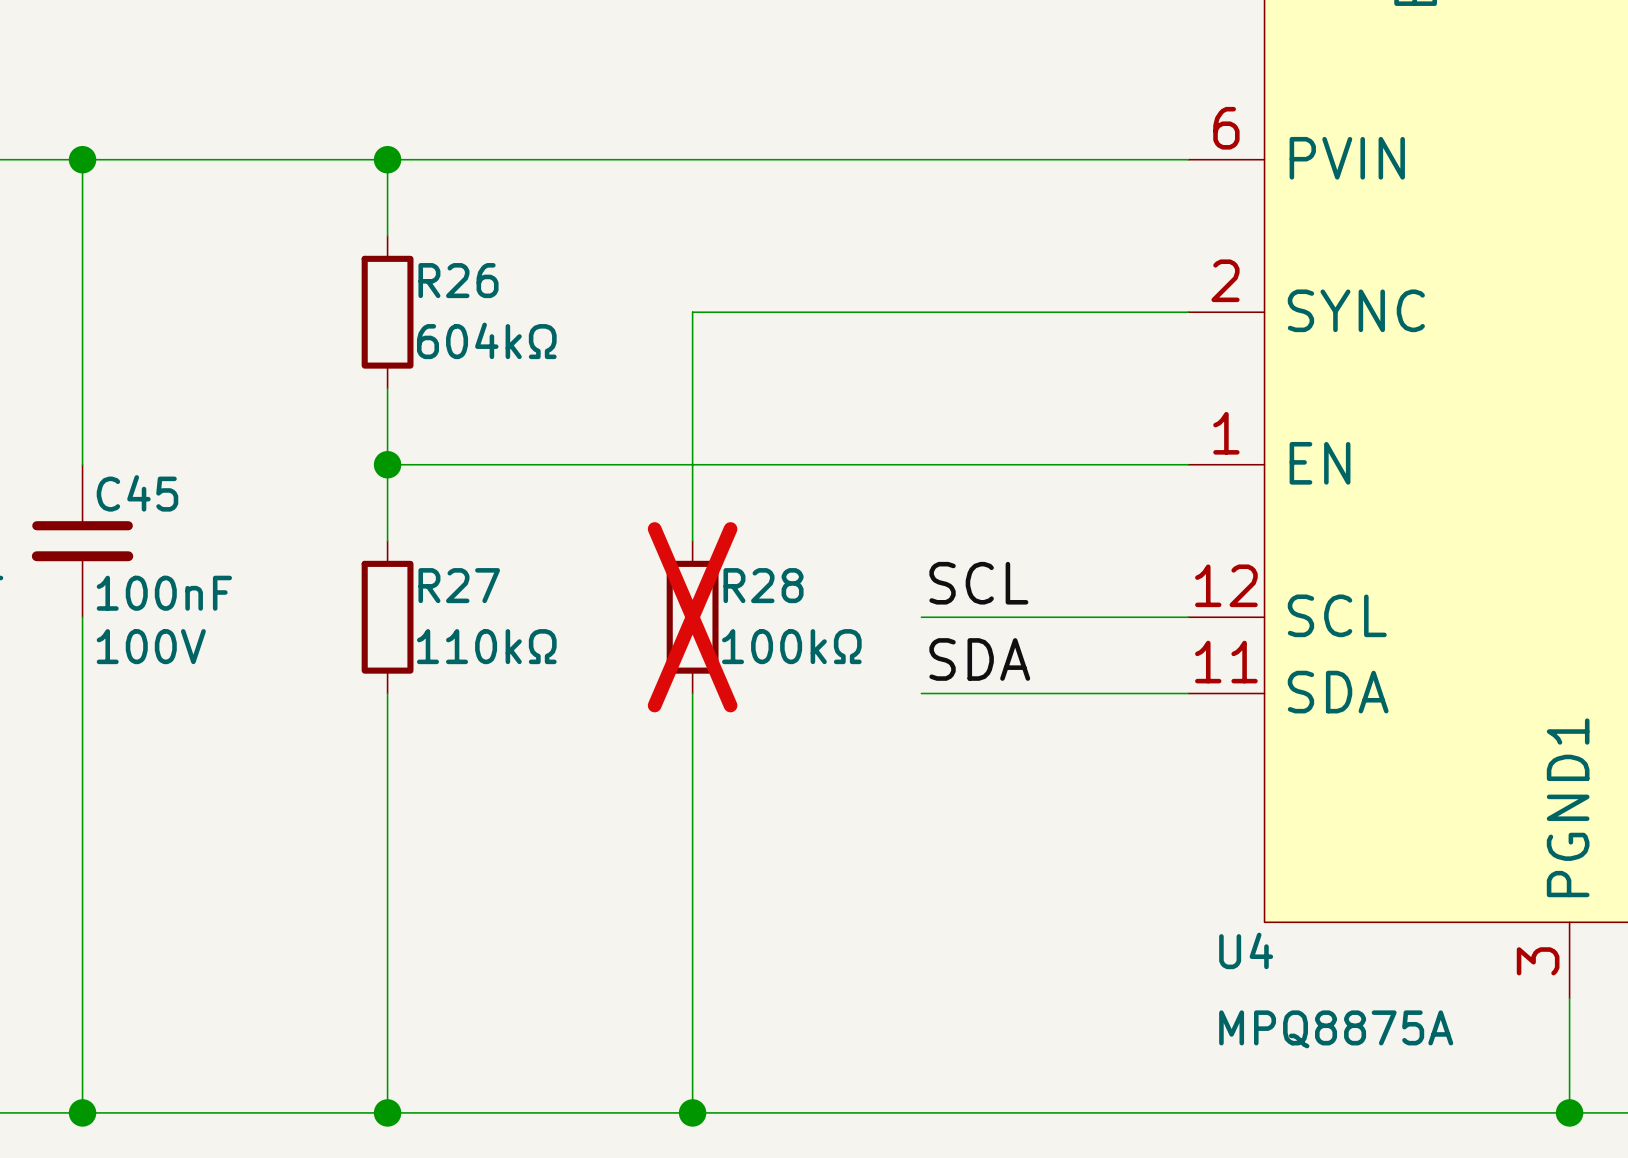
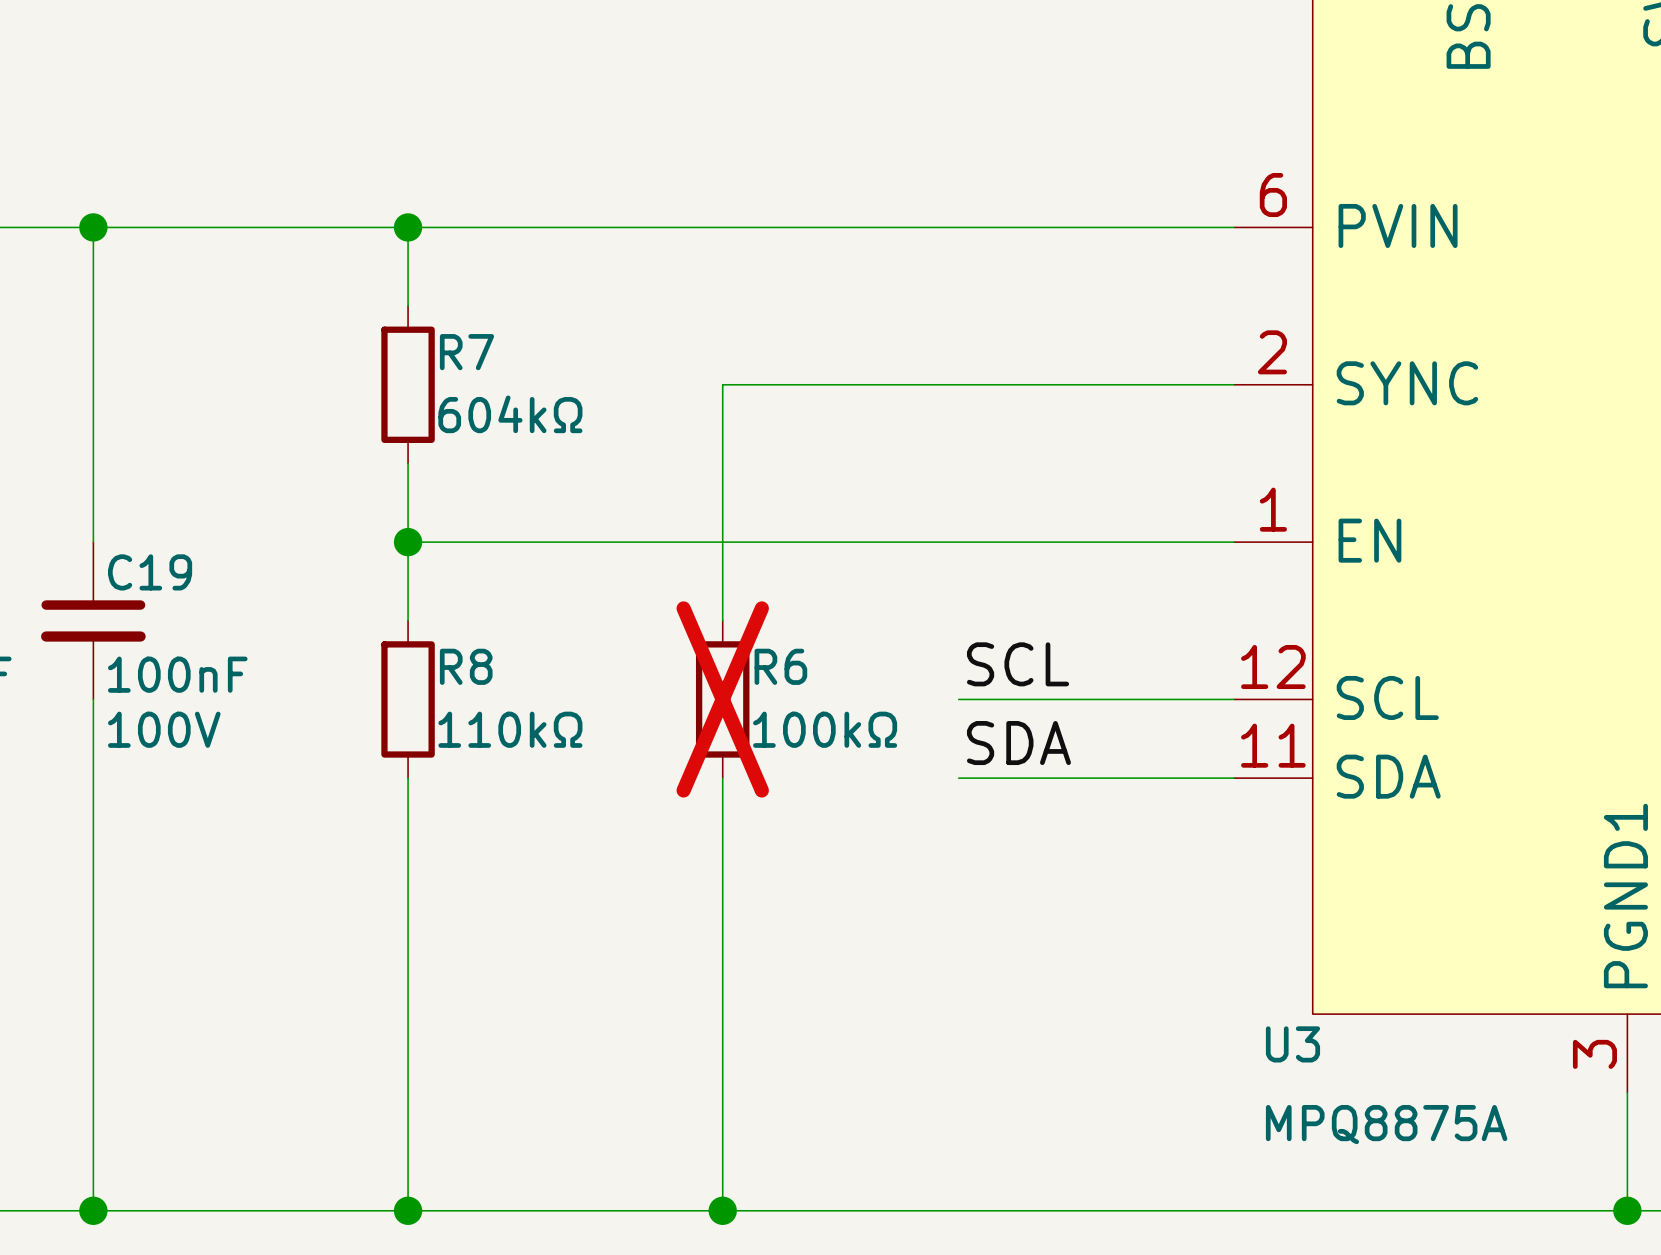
R26 name: R26 (458, 280) -> R7 (466, 352)
C45 name: C45 (137, 493) -> C19 (150, 572)
R27 name: R27 (459, 585) -> R8 (466, 666)
R28 name: R28 (763, 585) -> R6 (780, 666)
U4 name: U4 (1246, 950) -> U3 (1292, 1044)

